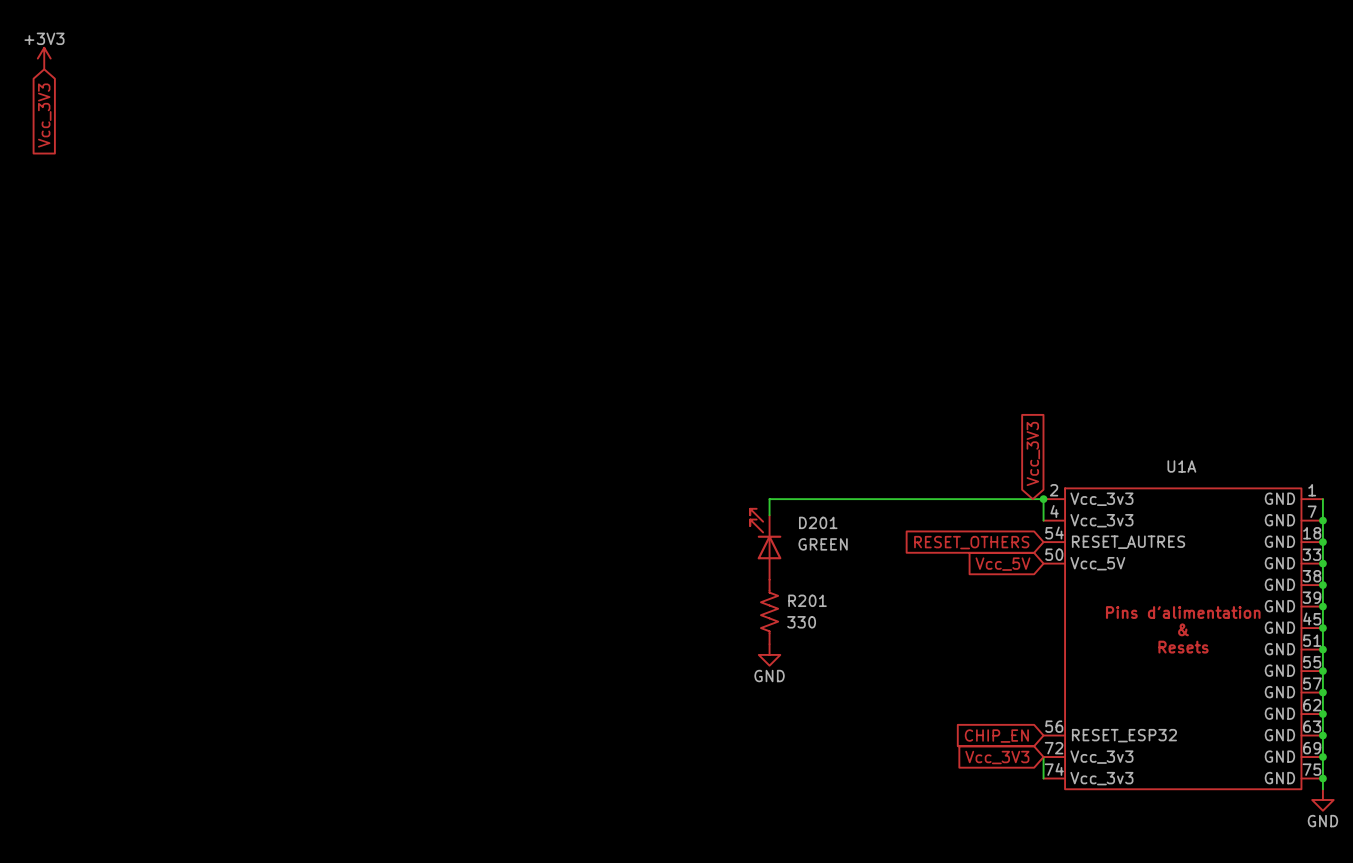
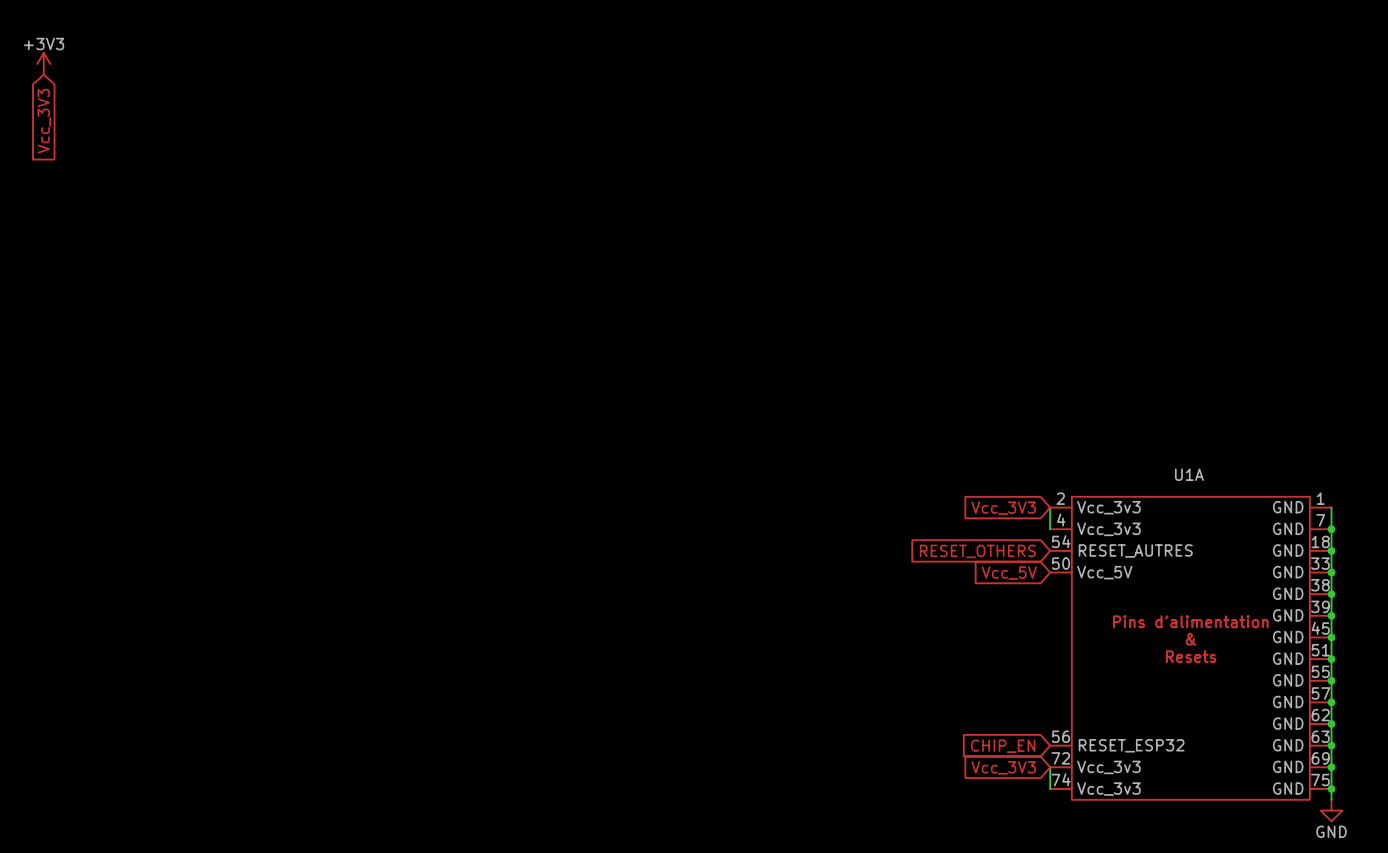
global label rotation: 0° (1033, 453) -> 90° counterclockwise (1003, 508)
wire: (1043, 499) (769, 499) (769, 515) -> none
junction: (1043, 499) -> none
D201: GREEN (765, 544) -> none
R201: 330 (769, 611) -> none
power symbol: GND (769, 654) -> none

